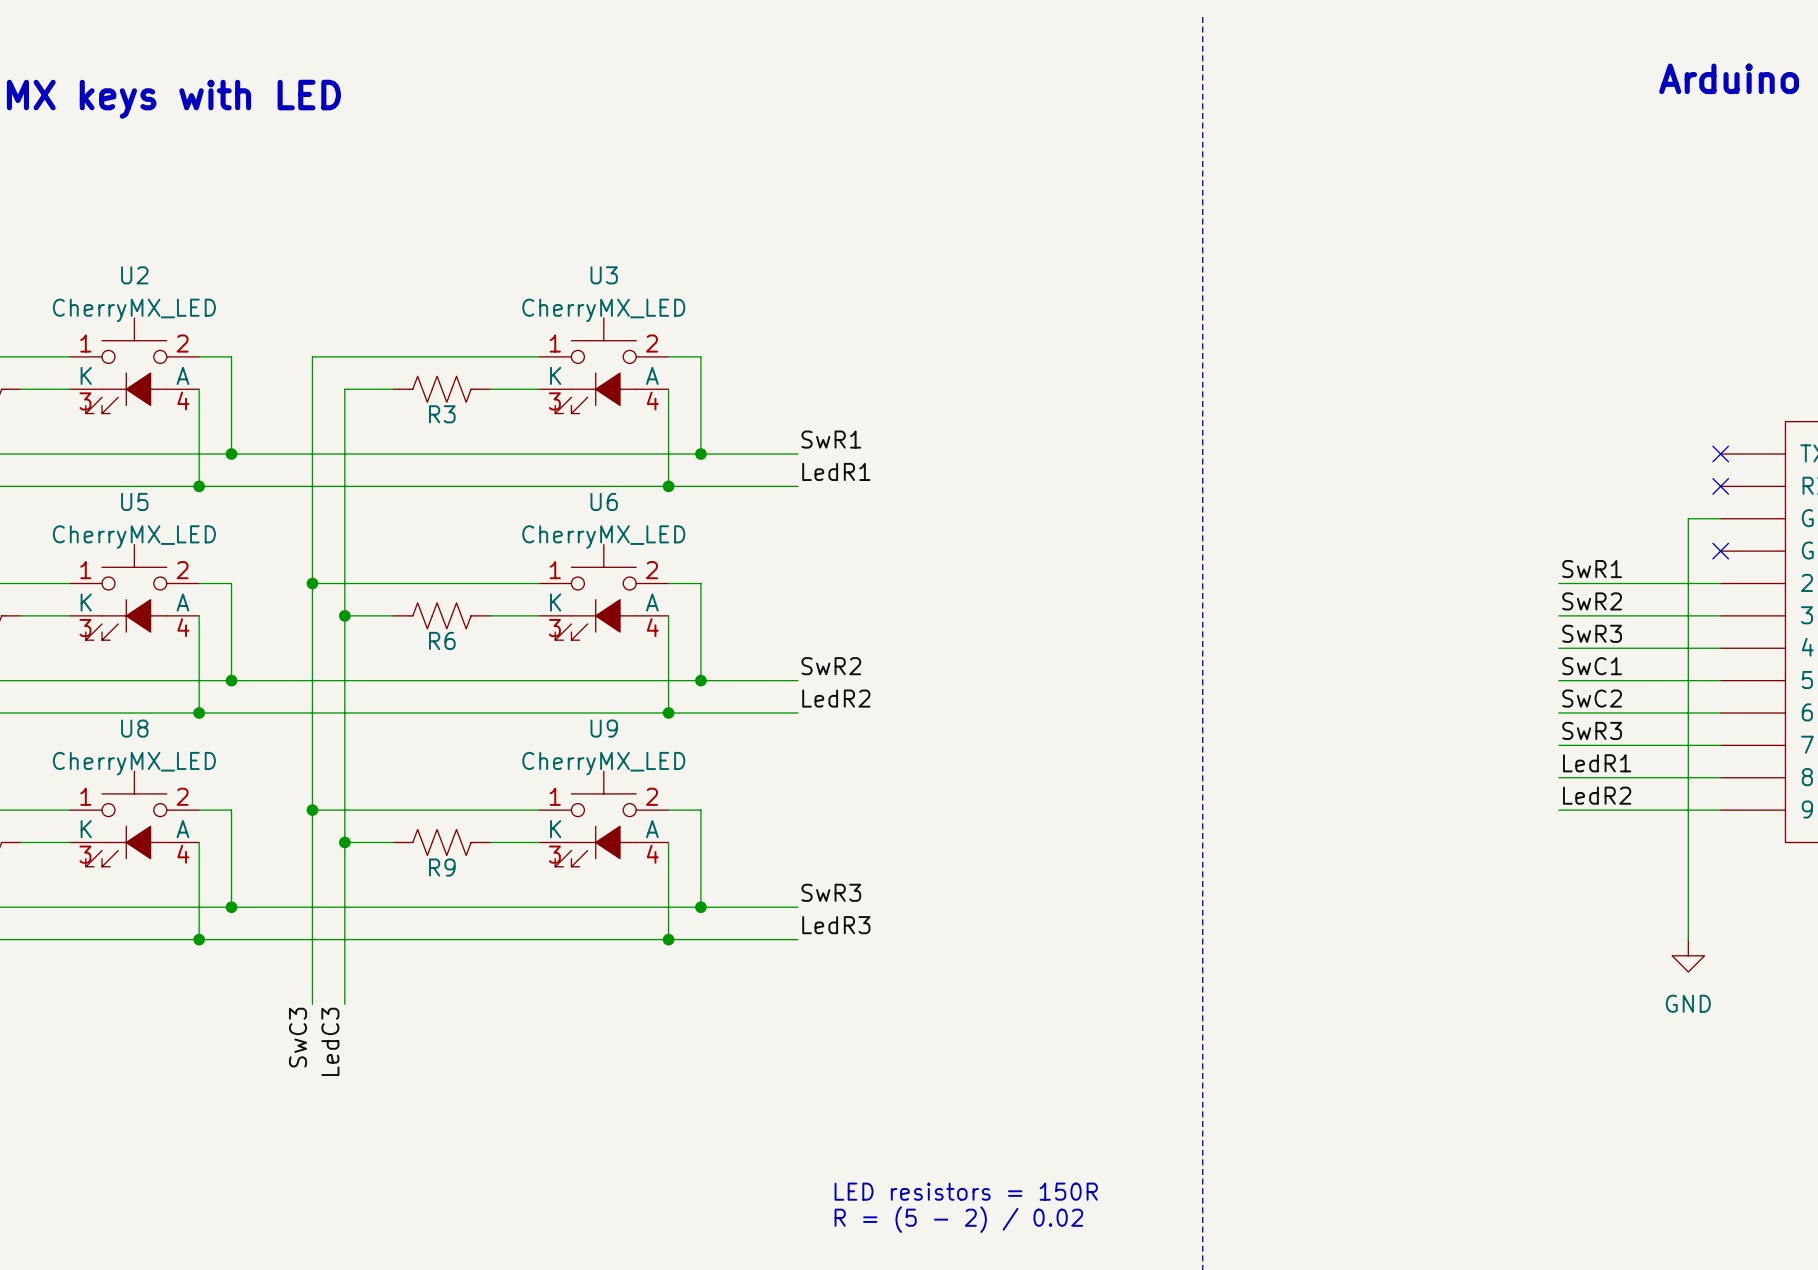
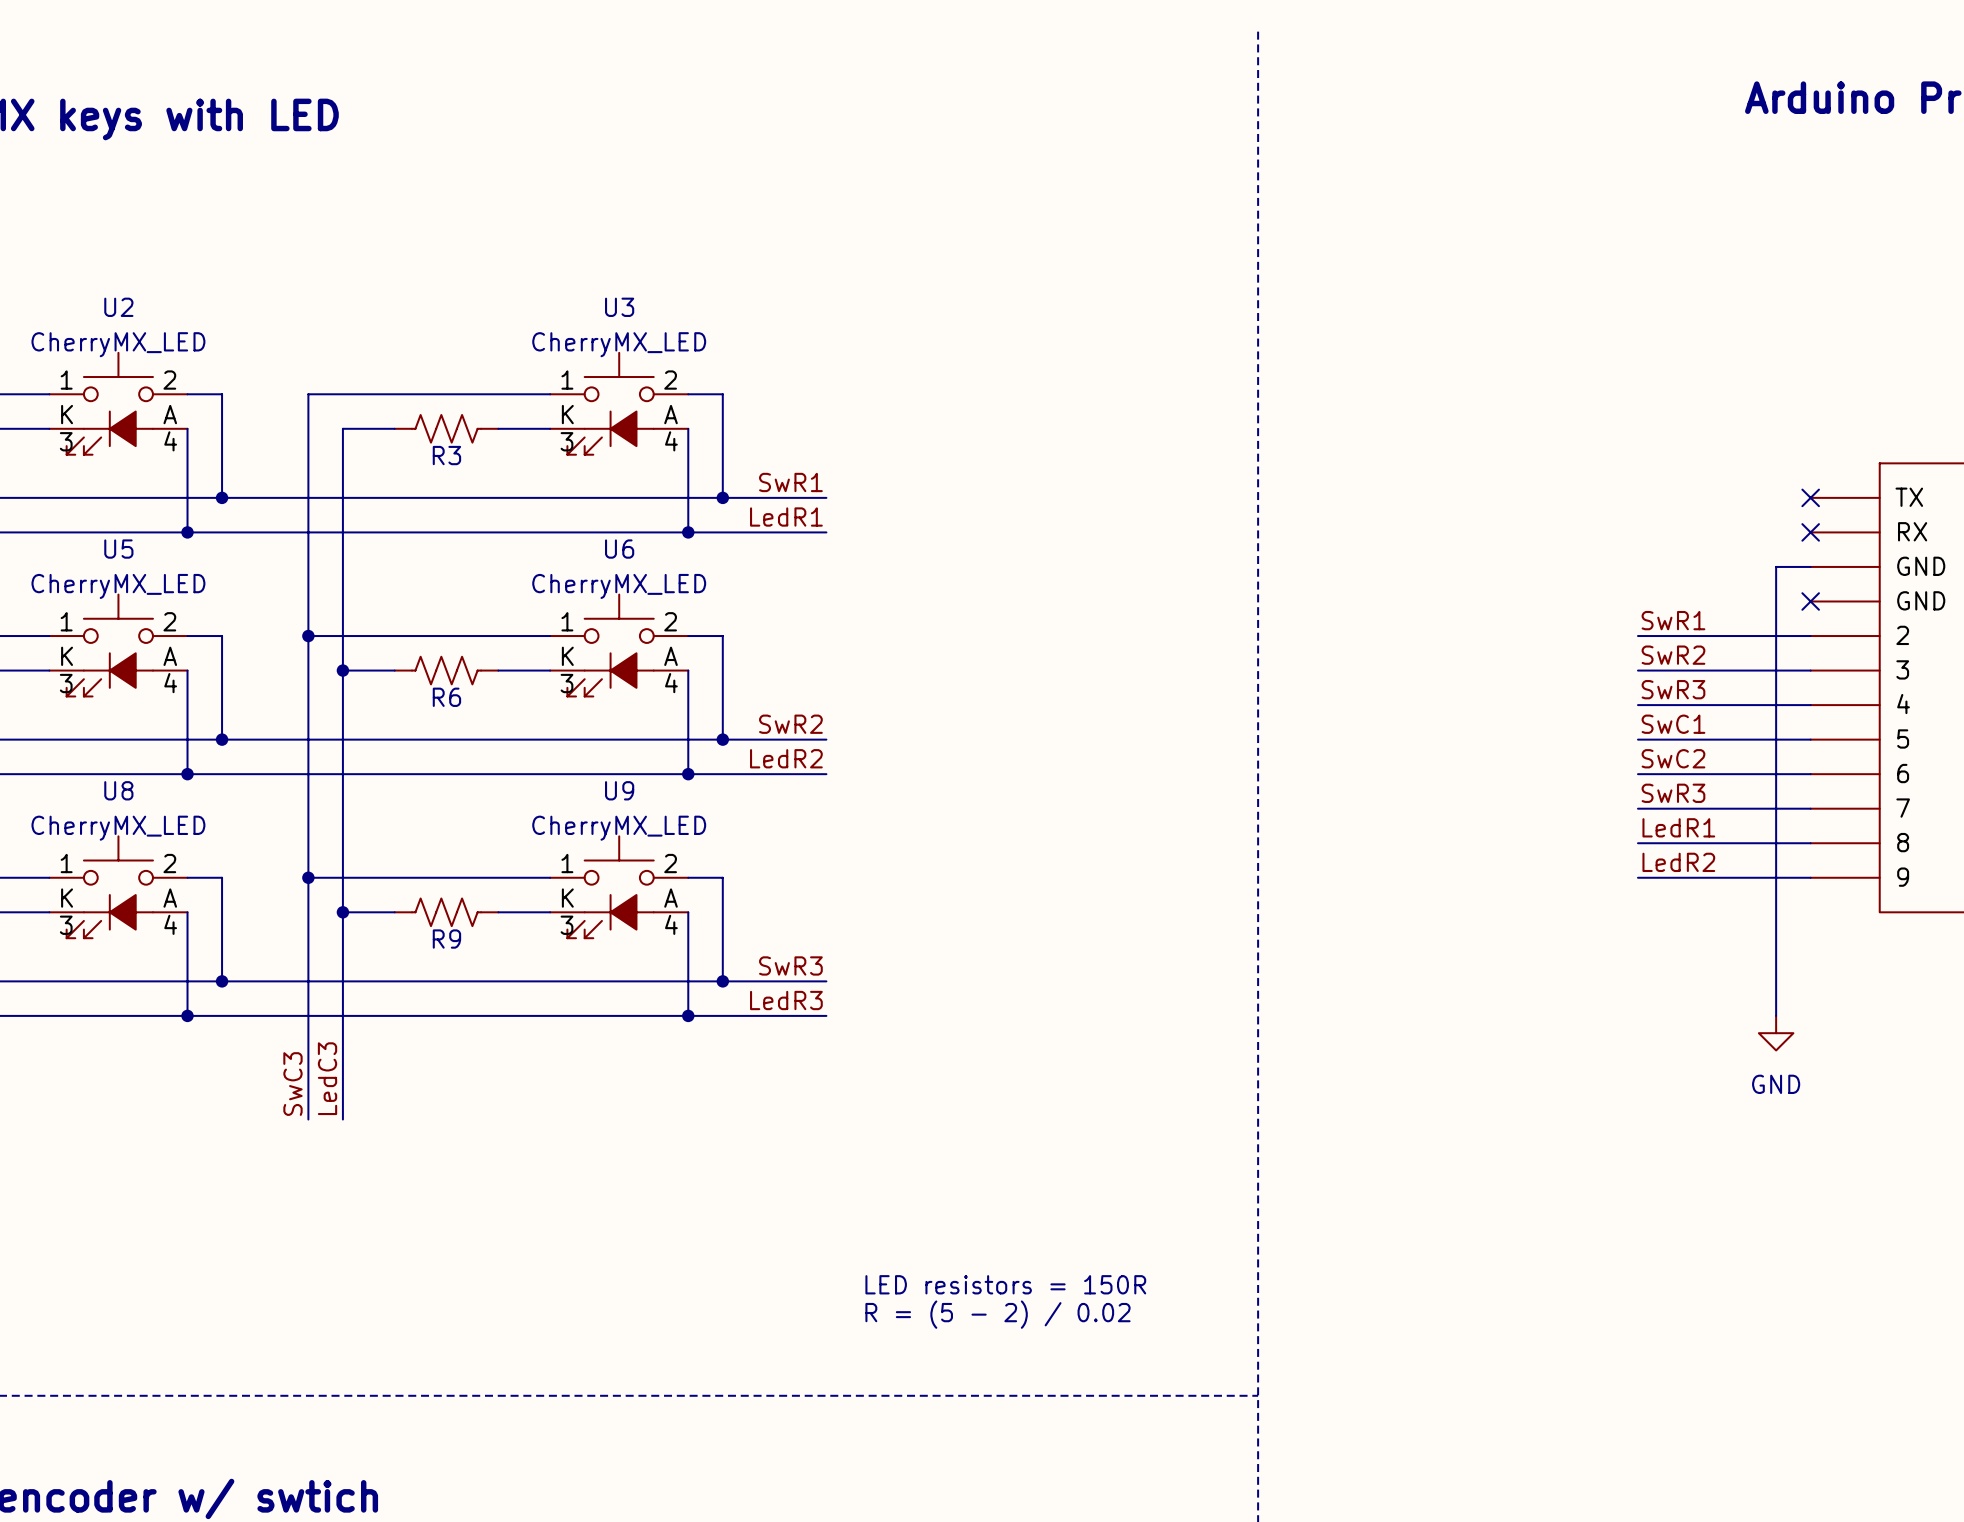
label position: SwR1 (831, 439) -> SwR1 (790, 482)
label position: LedR1 (836, 471) -> LedR1 (786, 517)
label position: SwR2 (831, 666) -> SwR2 (790, 724)
label position: LedR2 (836, 698) -> LedR2 (786, 758)
label position: SwR3 (831, 892) -> SwR3 (790, 965)
label position: LedR3 (836, 925) -> LedR3 (786, 1000)
wire: none -> (308, 1084) (308, 1119)
wire: none -> (342, 1084) (342, 1119)
label position: SwC3 (298, 1037) -> SwC3 (292, 1084)
label position: LedC3 (330, 1041) -> LedC3 (327, 1078)

